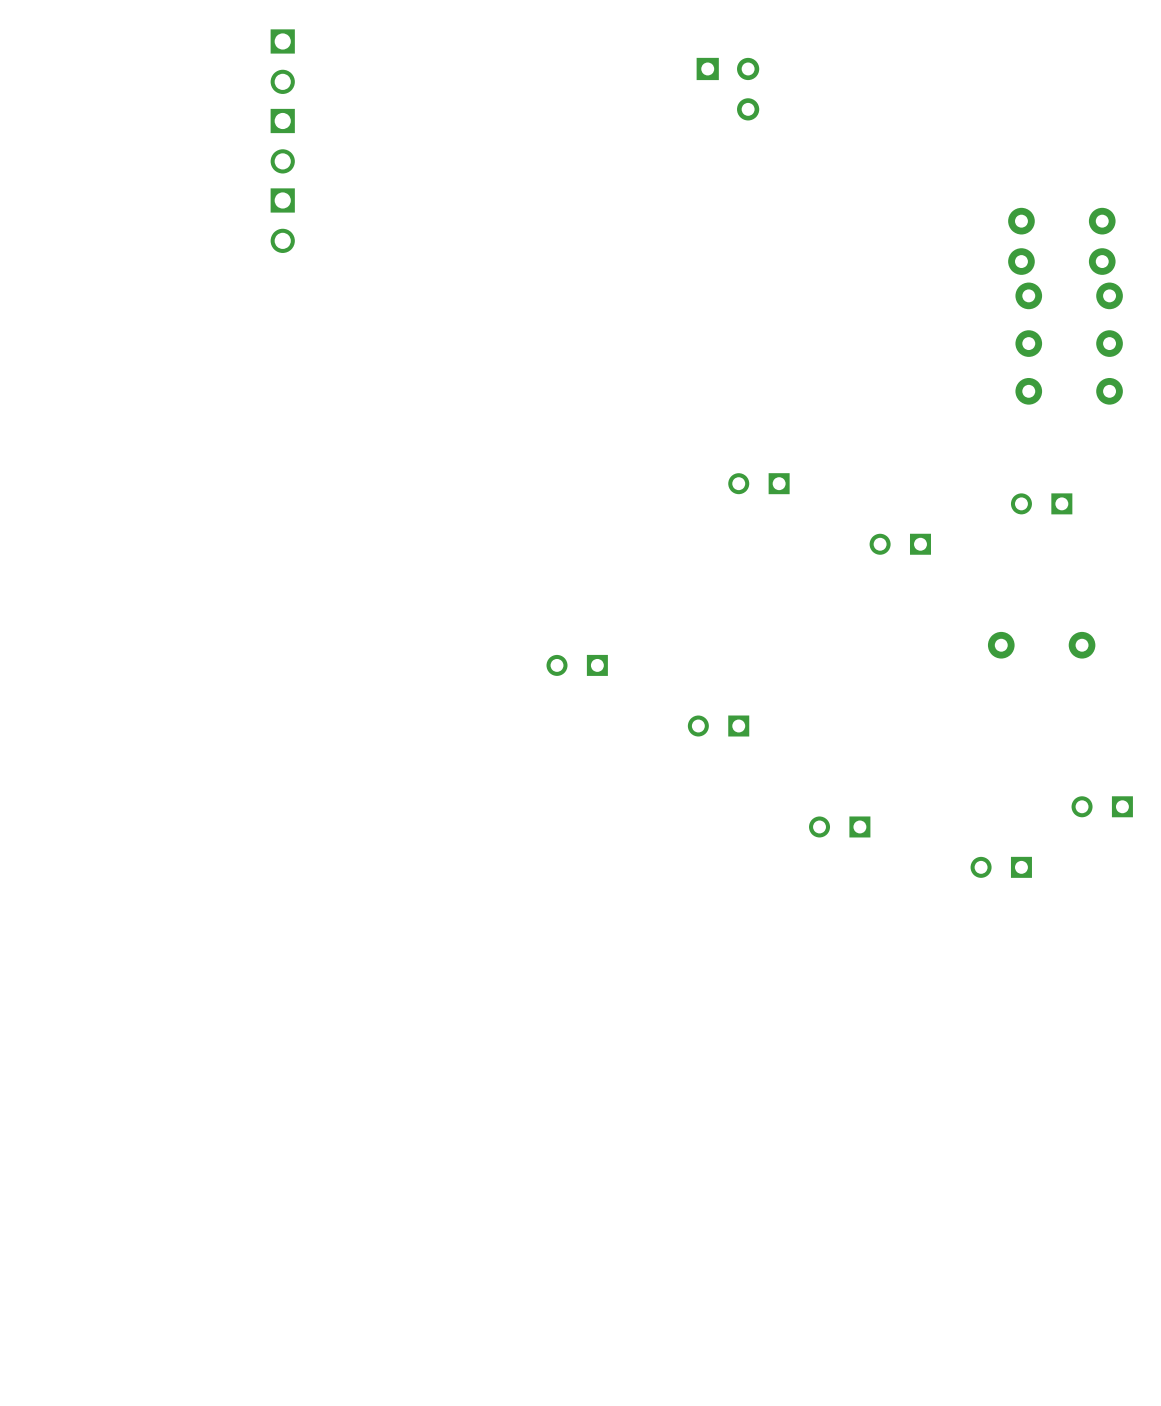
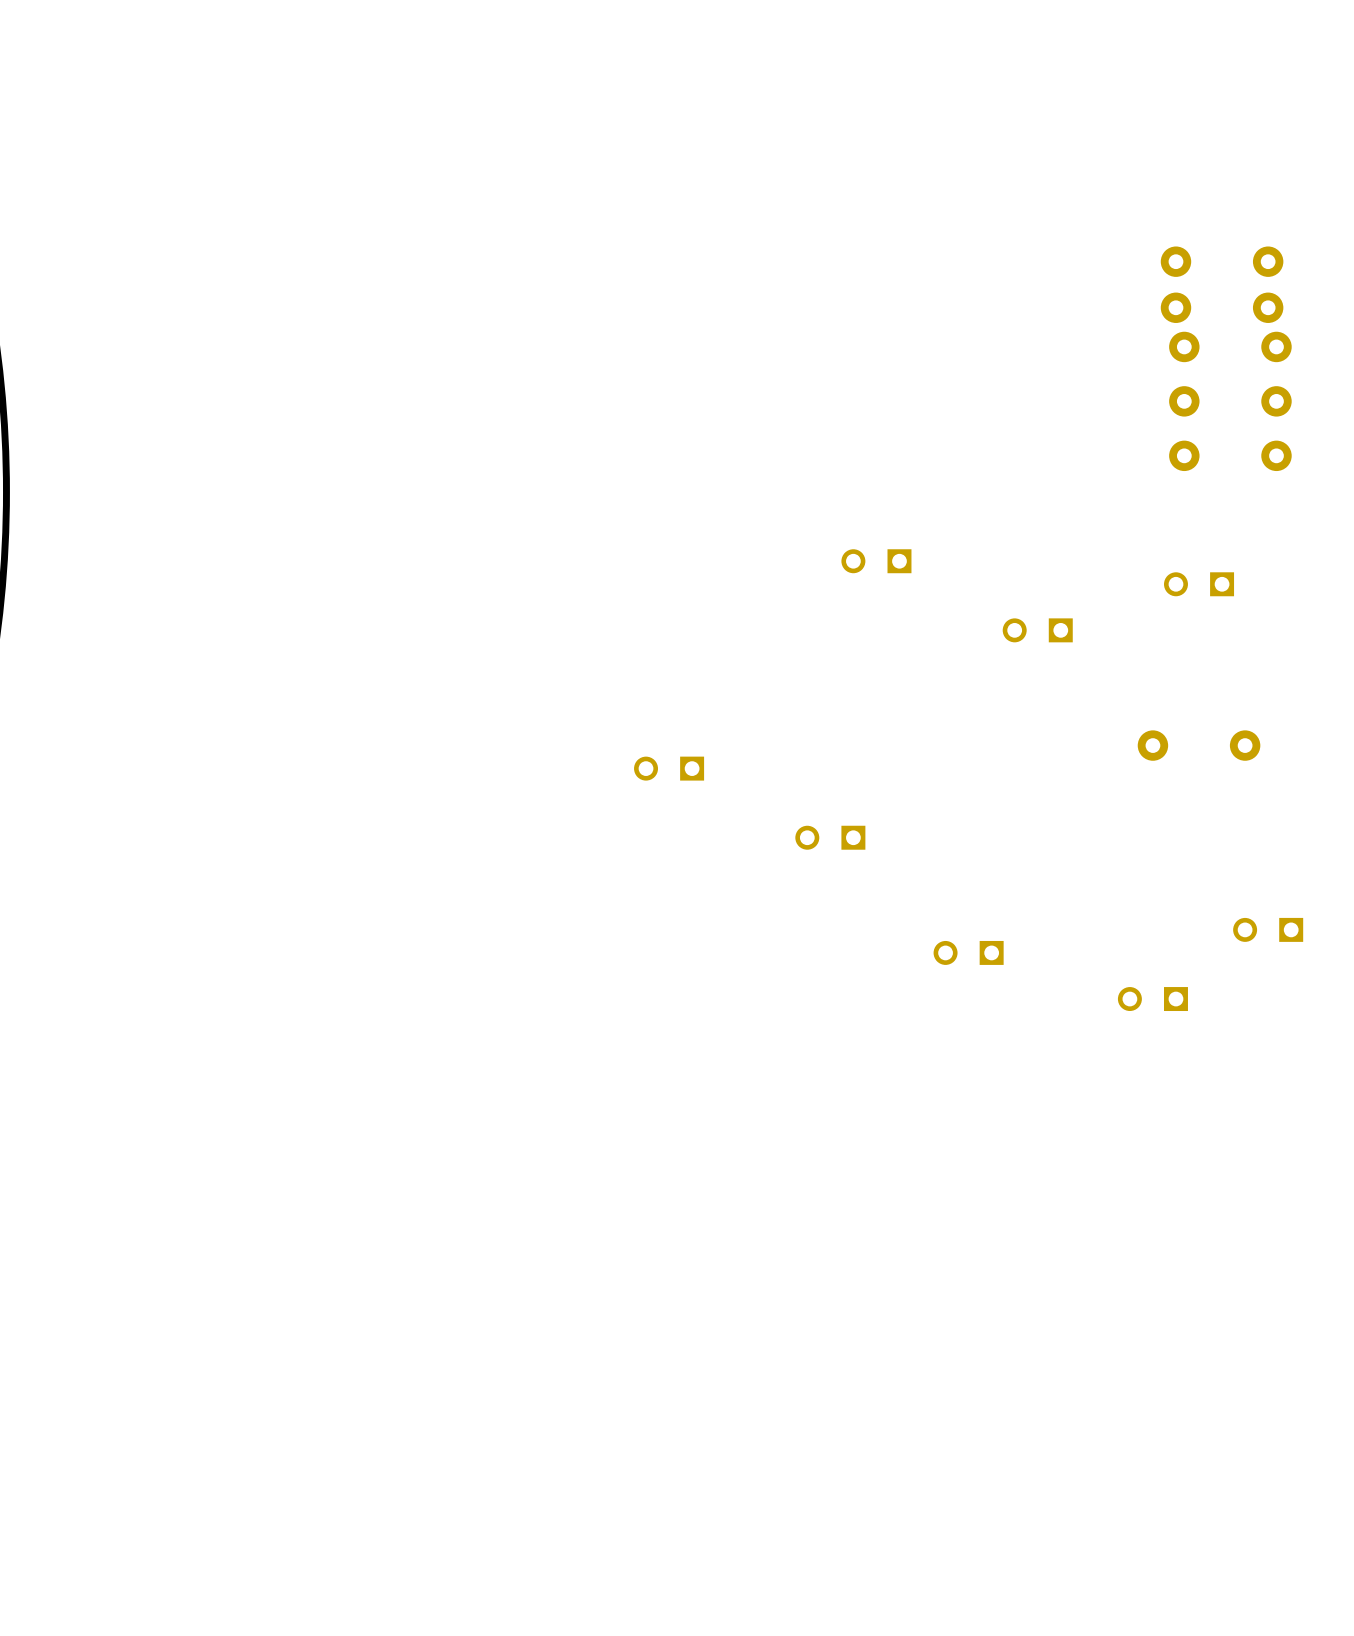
part: (282, 61) -> none
part: (727, 89) -> none
part: (282, 141) -> none
part: (282, 220) -> none

